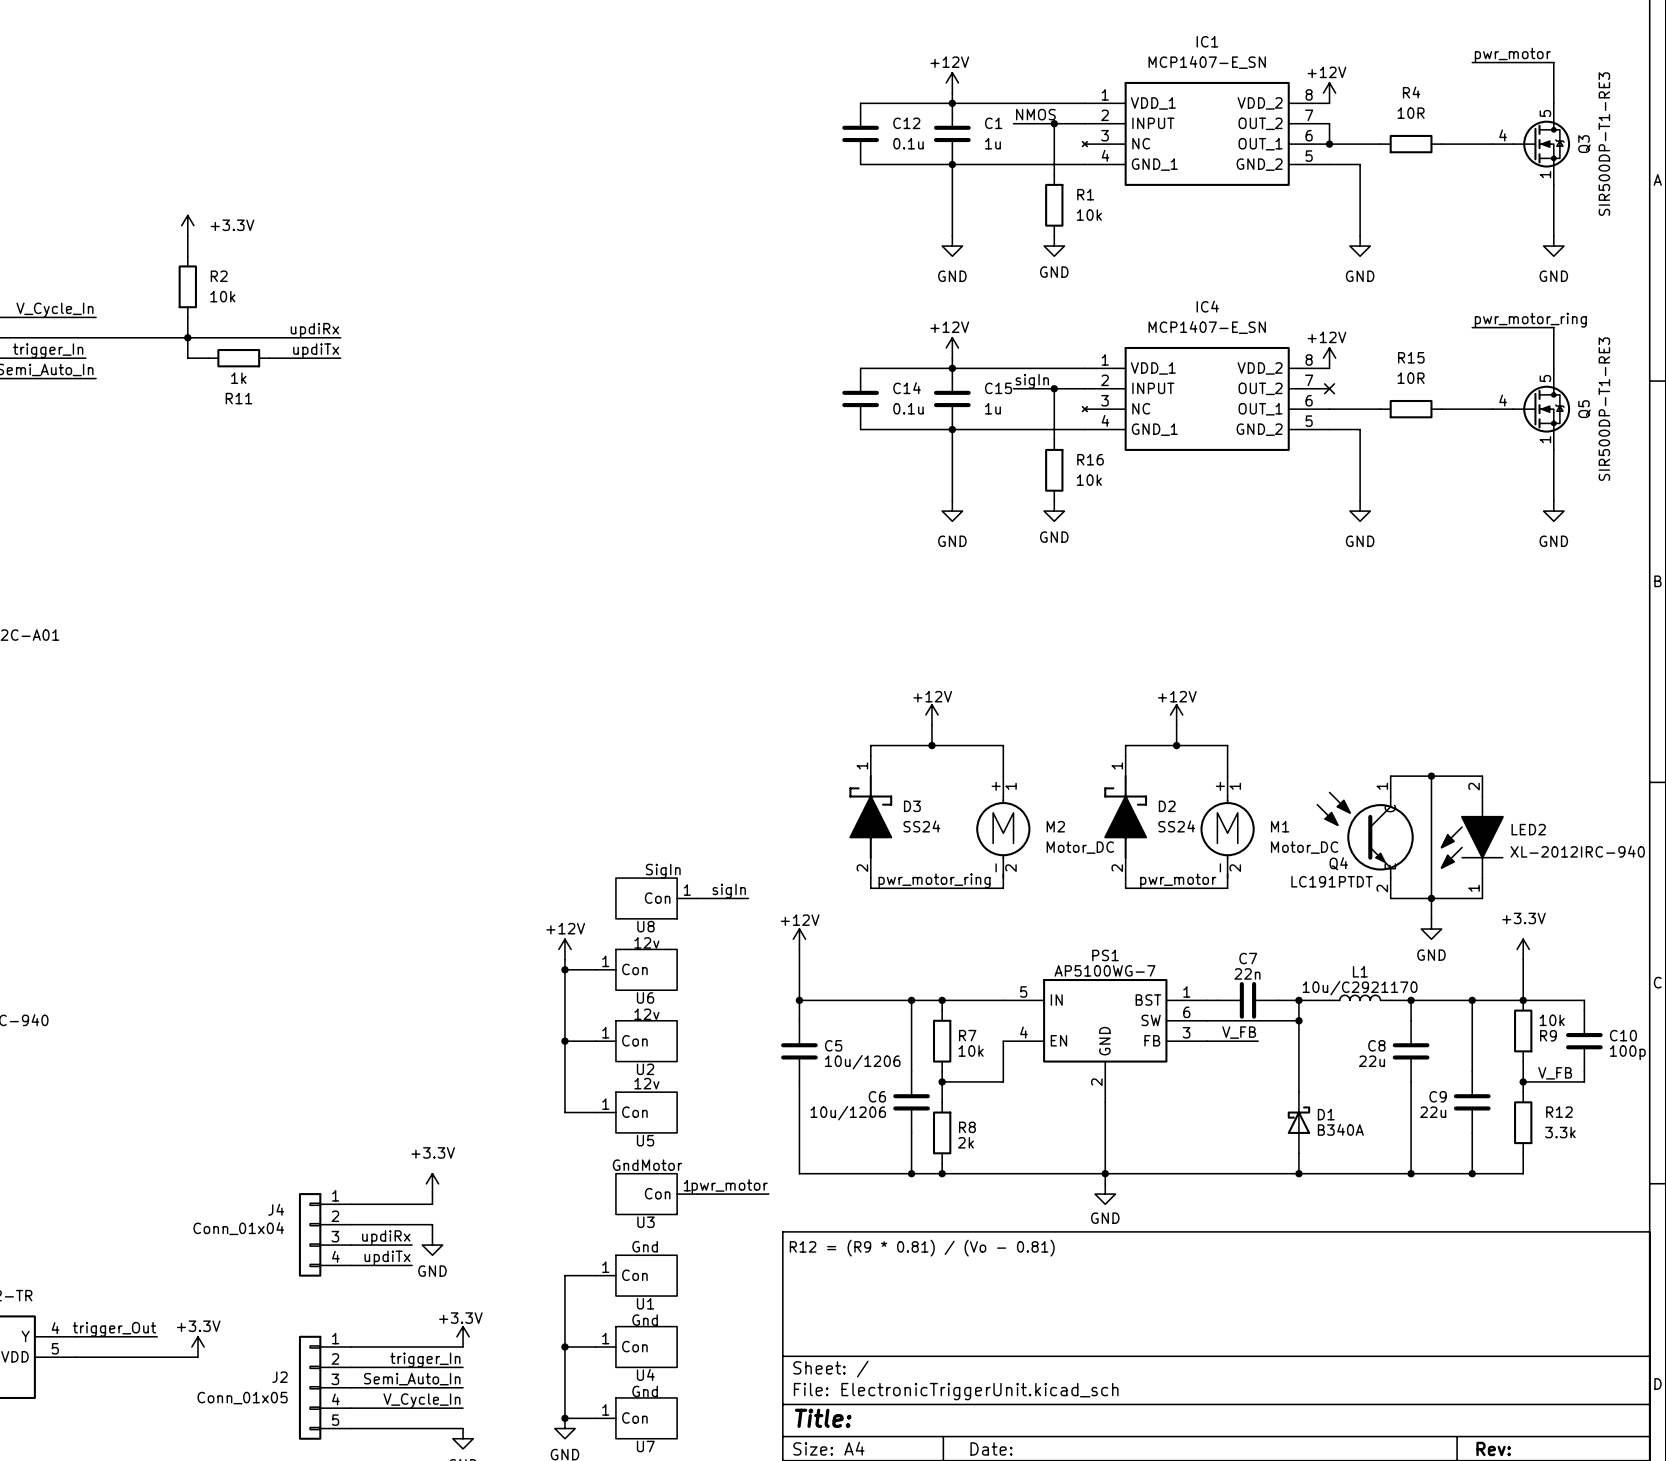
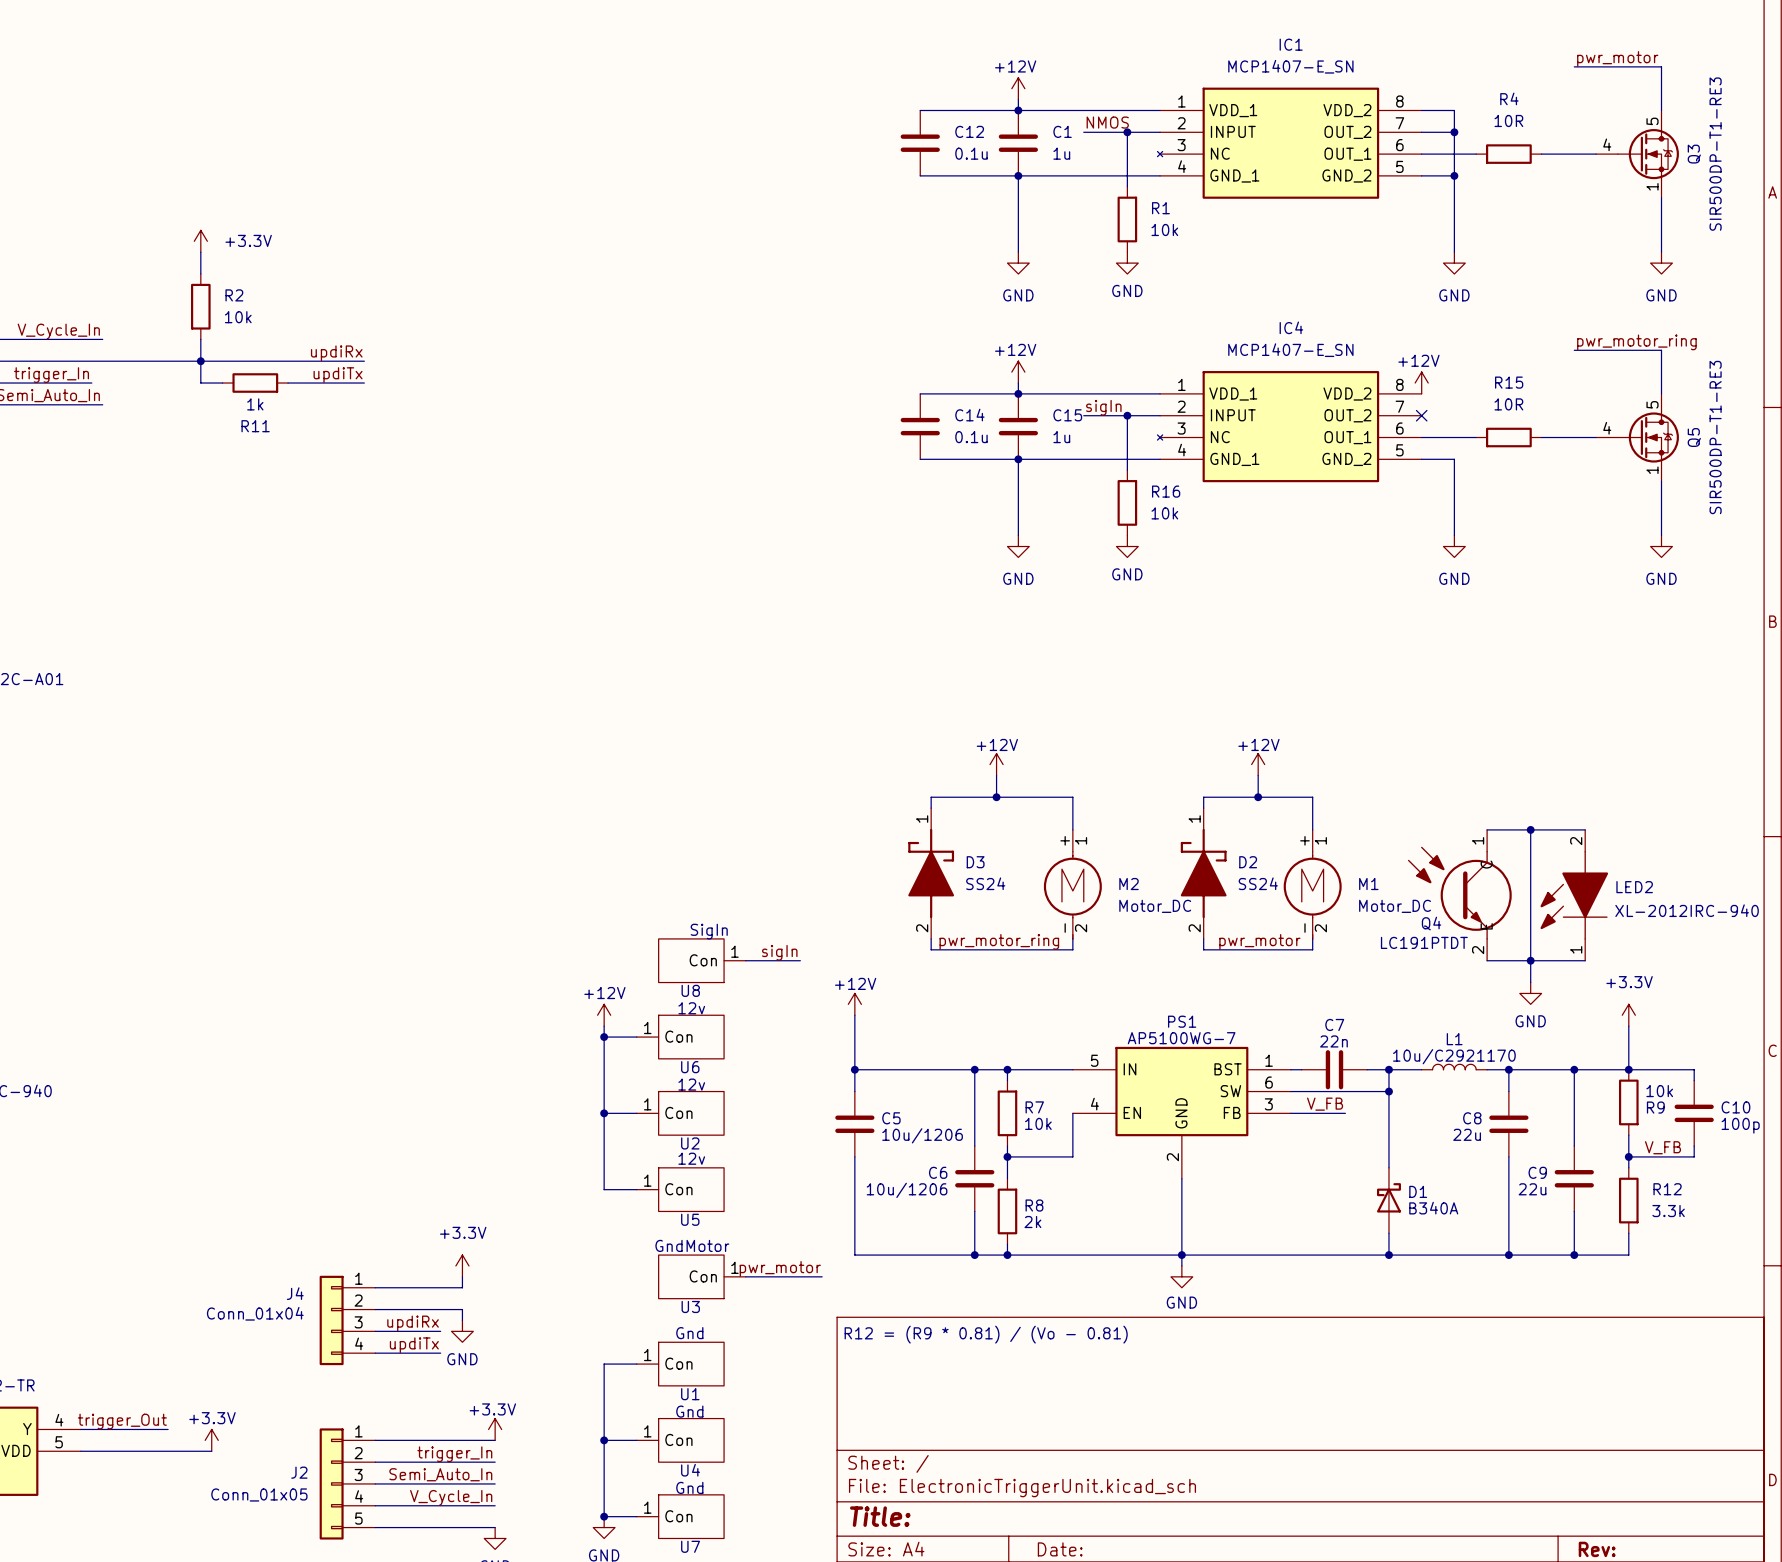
power symbol: +12V (1329, 93) -> none
wire: none -> (1421, 110) (1454, 110) (1454, 175)
wire: (1329, 123) (1329, 144) -> (1421, 132) (1454, 132)
junction: none -> (1454, 132)
junction: (1329, 144) -> none
junction: none -> (1454, 175)

